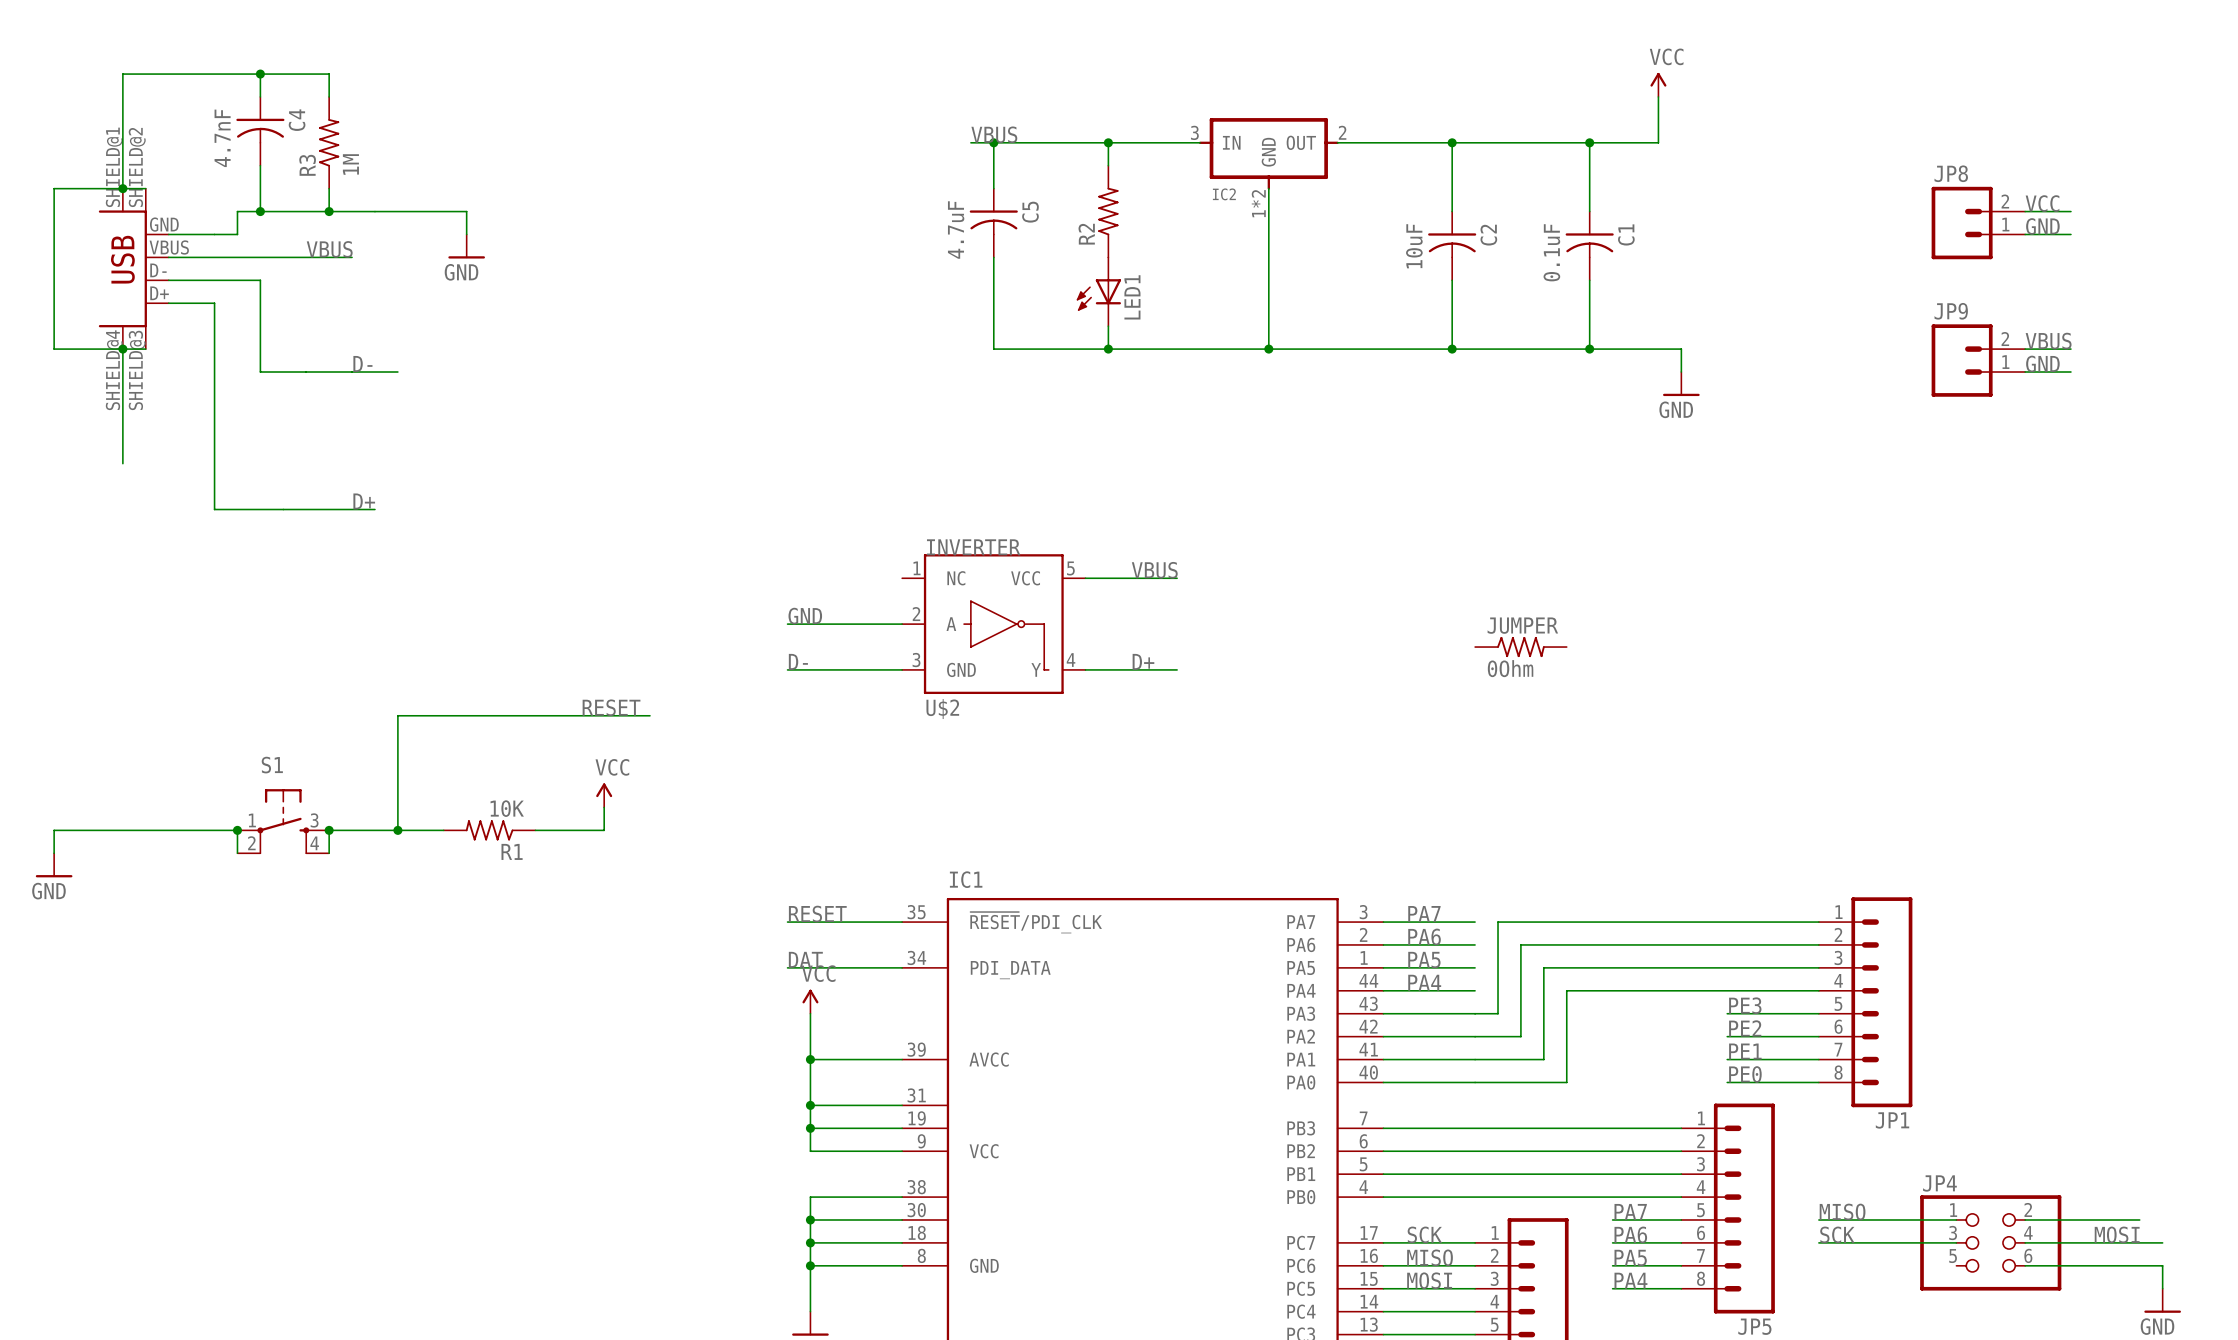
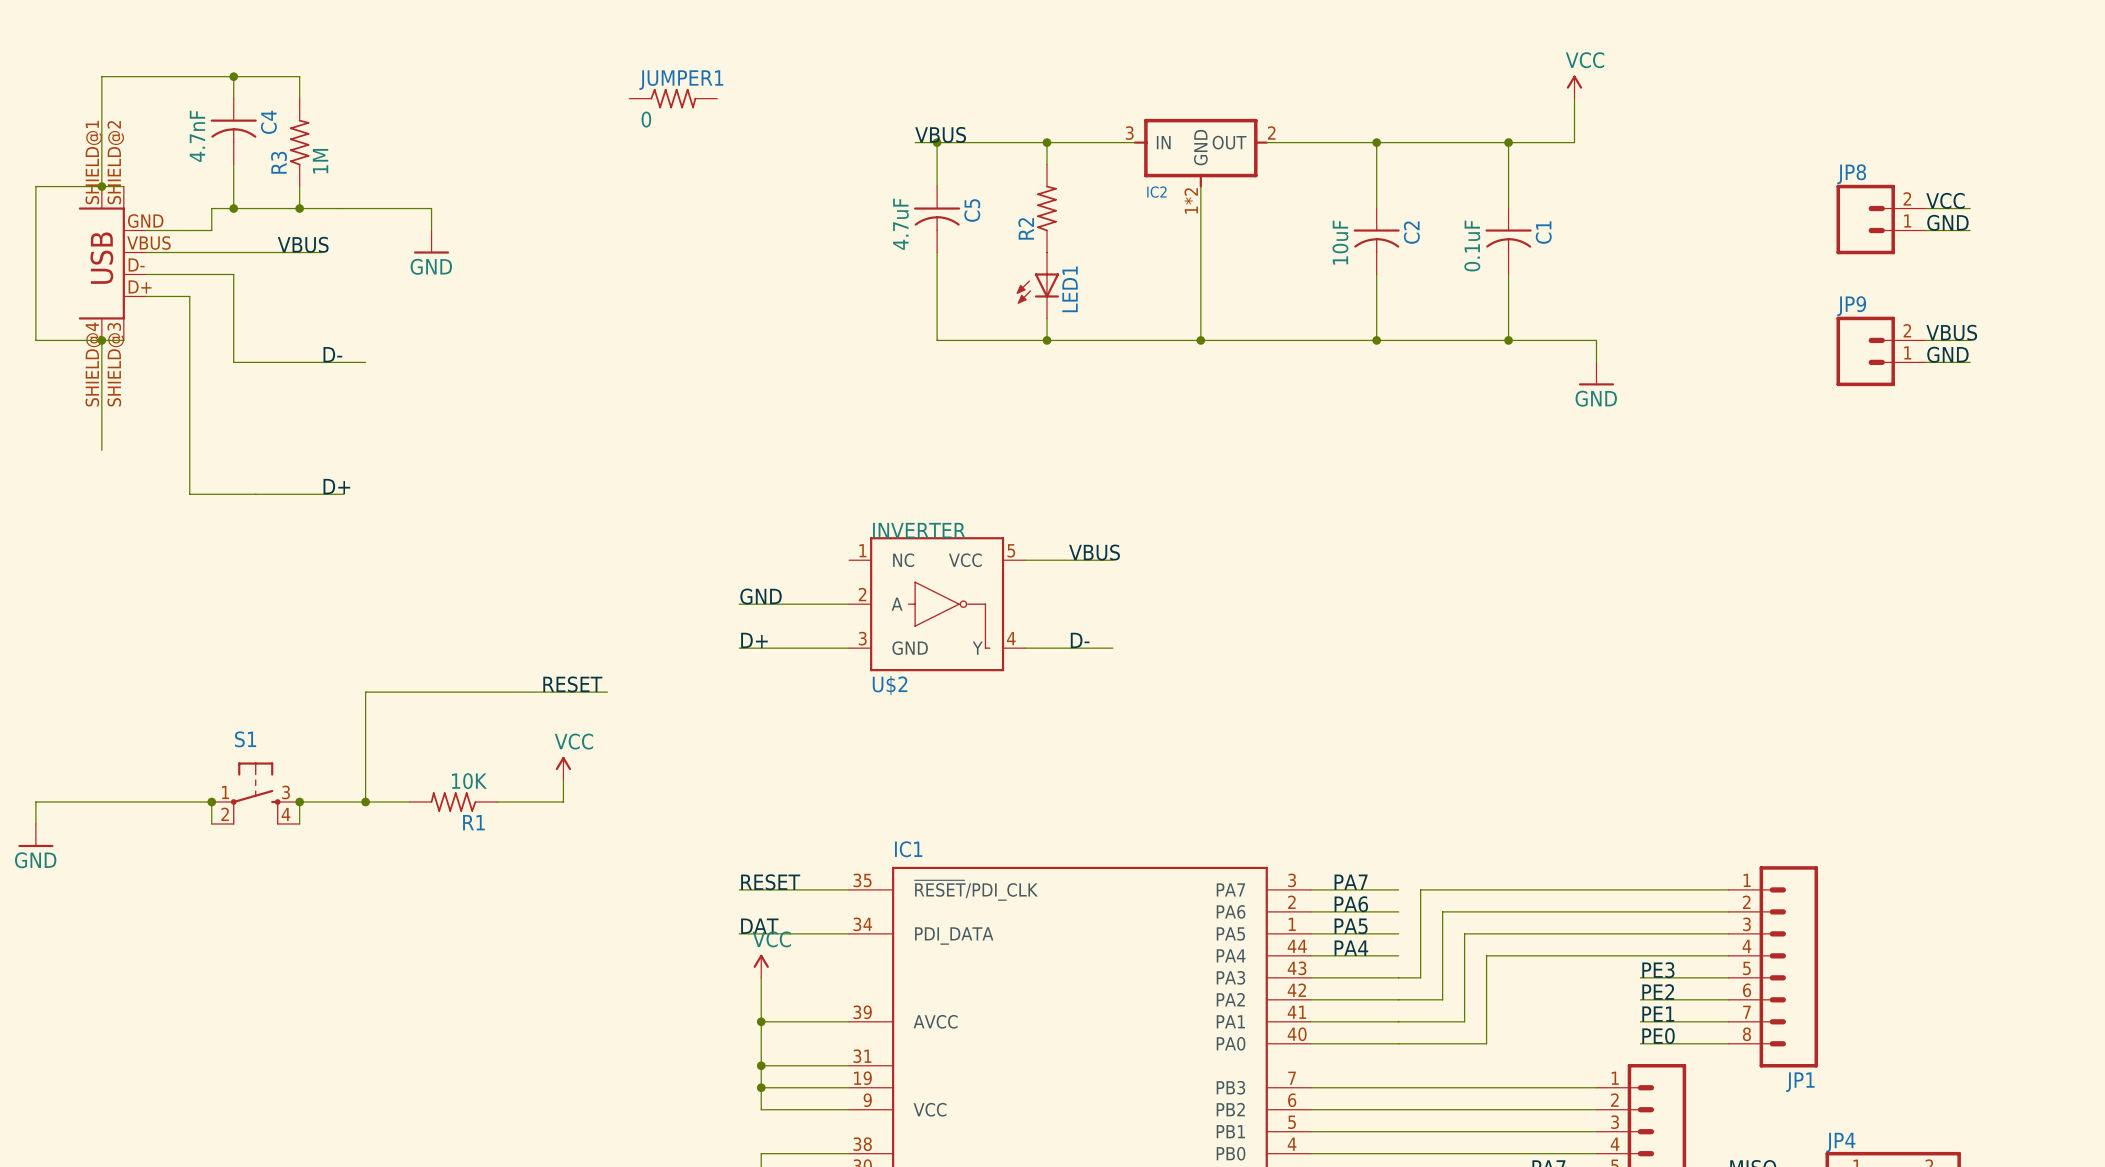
JUMPER1: none -> 0 (673, 98)
JUMPER: 0Ohm (1520, 647) -> none
label: D- (798, 661) -> D+ (754, 640)
label: D+ (1143, 661) -> D- (1080, 640)

